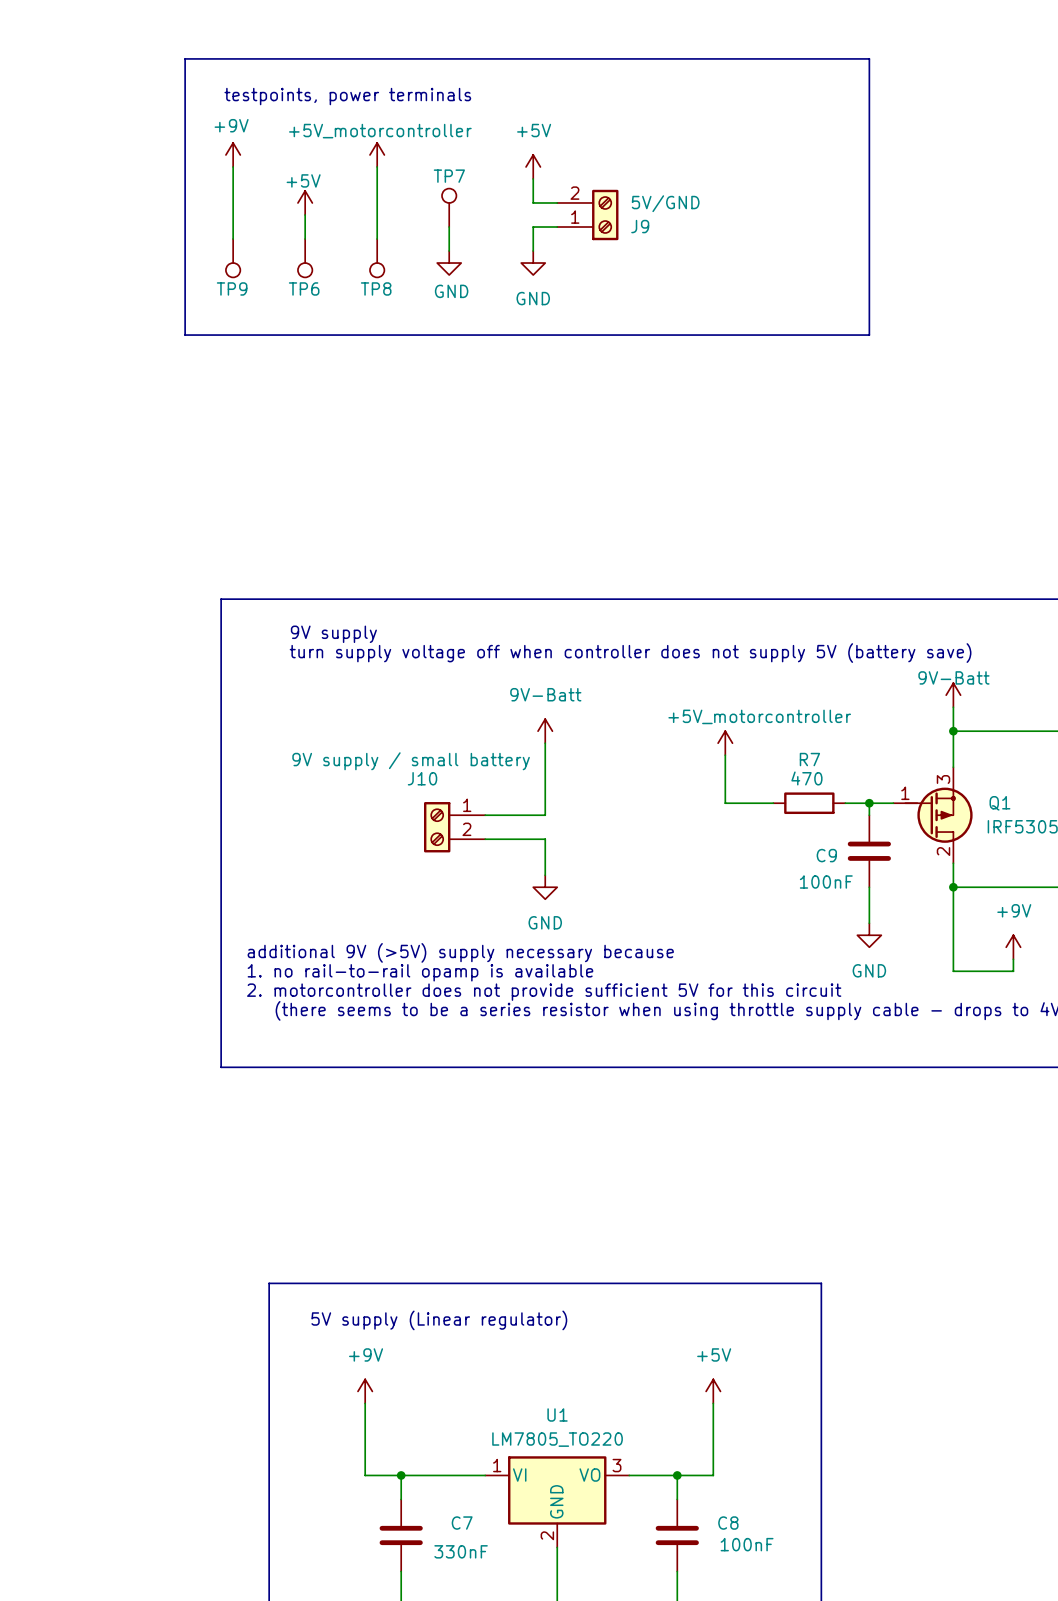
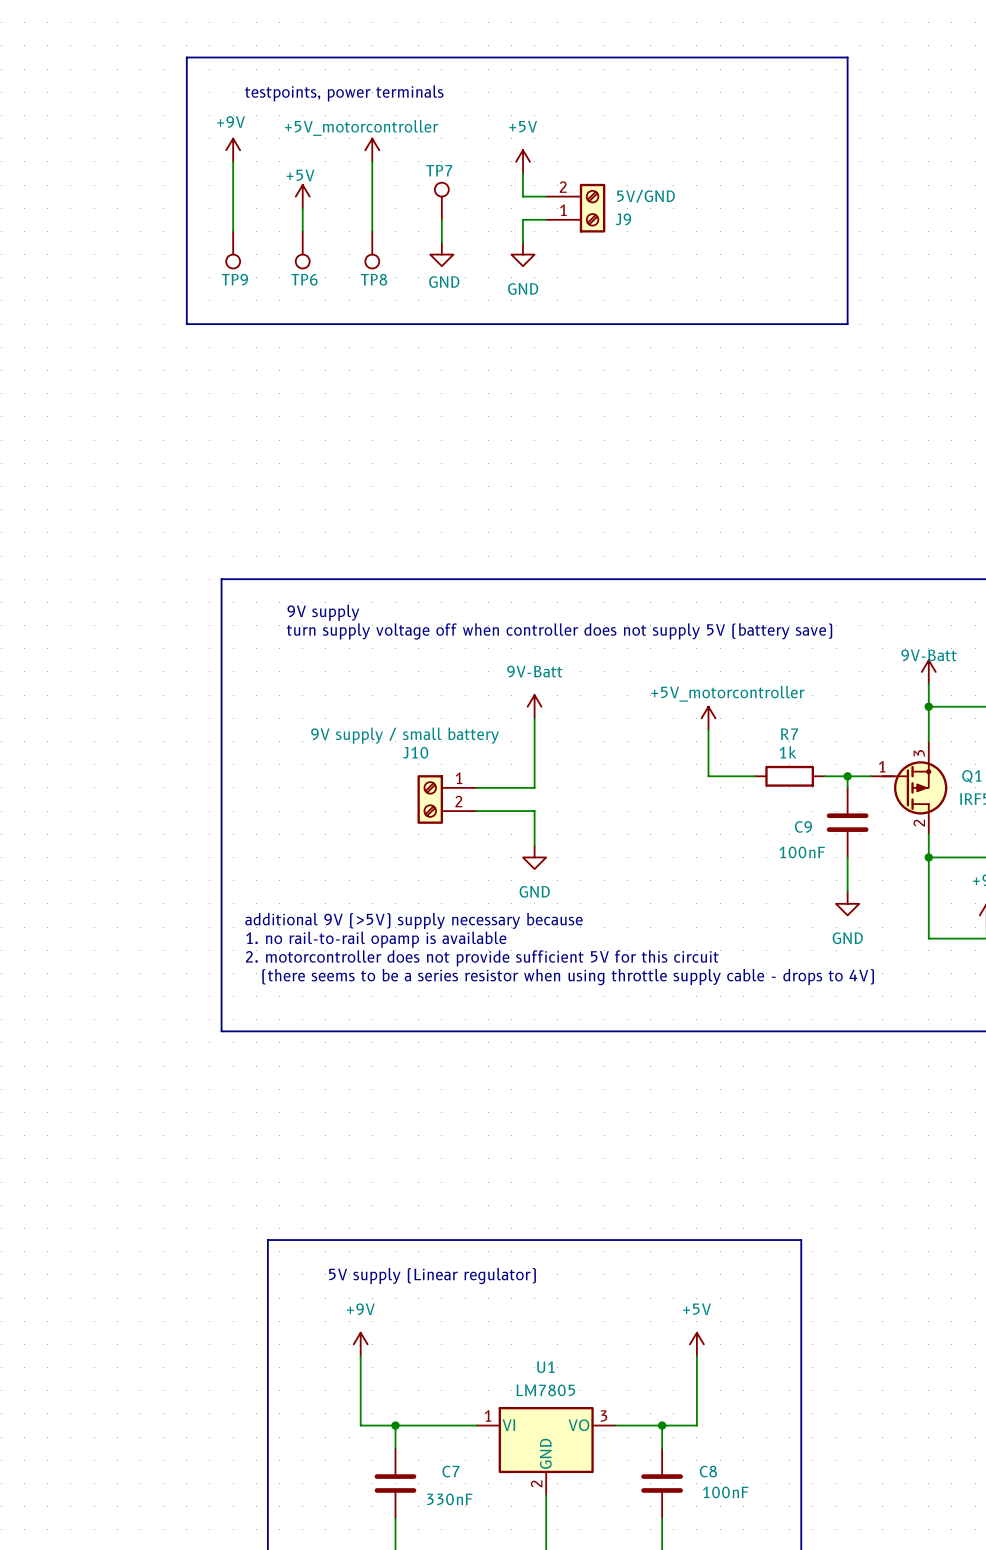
R7 value: 470 (806, 778) -> 1k (788, 752)
U1 value: LM7805_TO220 (557, 1439) -> LM7805 (545, 1390)

